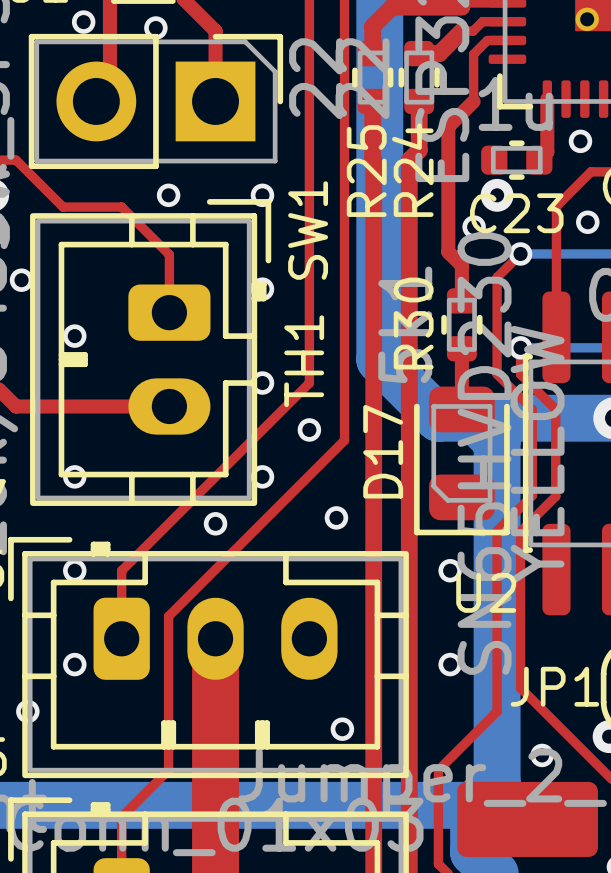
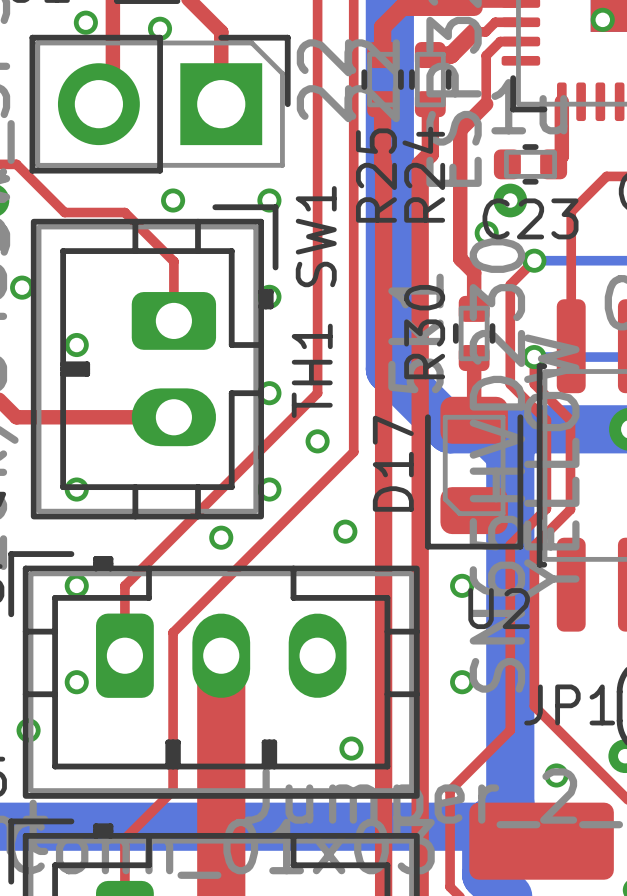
via: (580, 141) -> none
via: (587, 222) -> none

